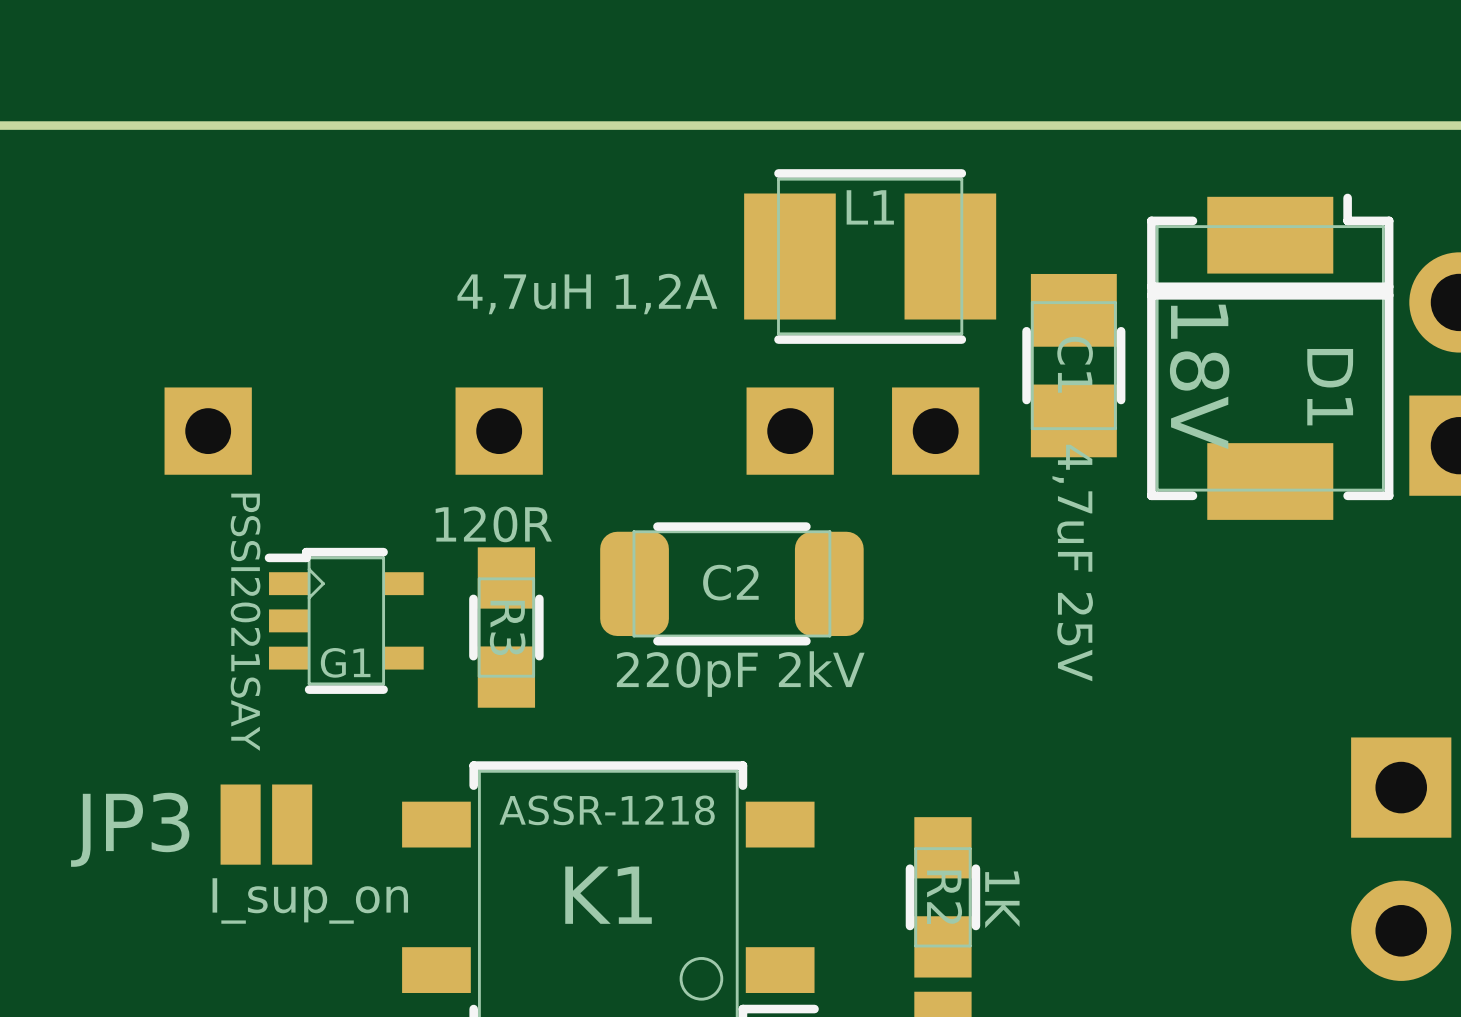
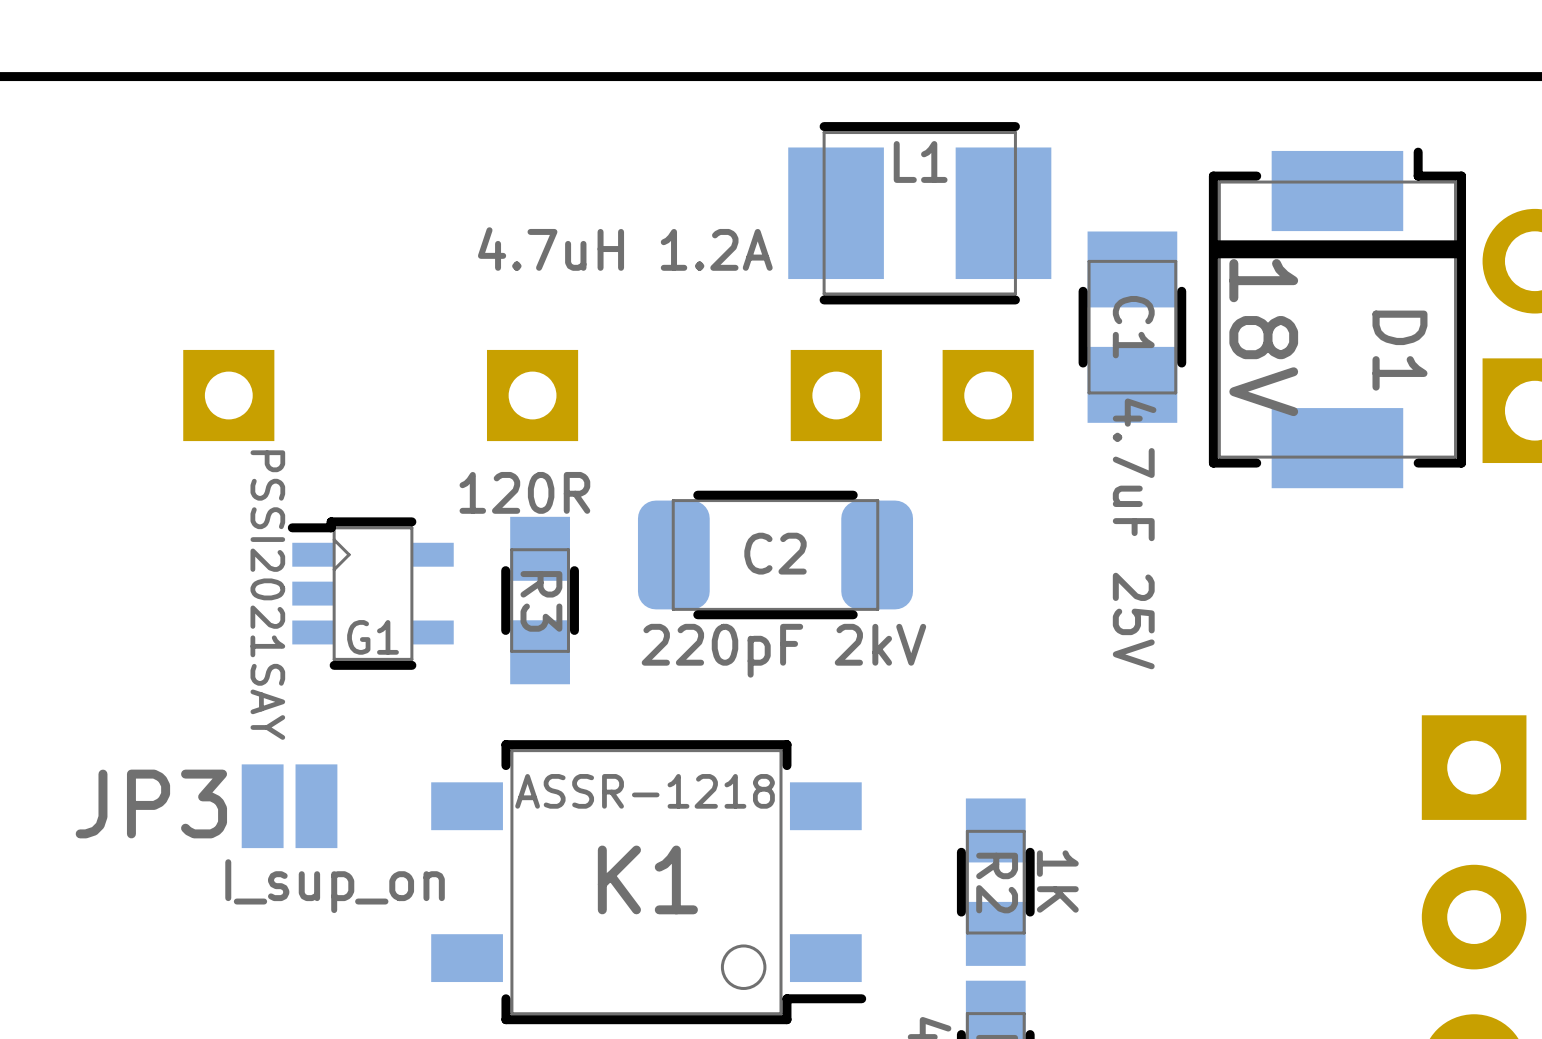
L1 value: 4,7uH 1,2A (587, 294) -> 4.7uH 1.2A (625, 249)
C1 value: 4,7uF 25V (1072, 563) -> 4.7uF 25V (1134, 533)

